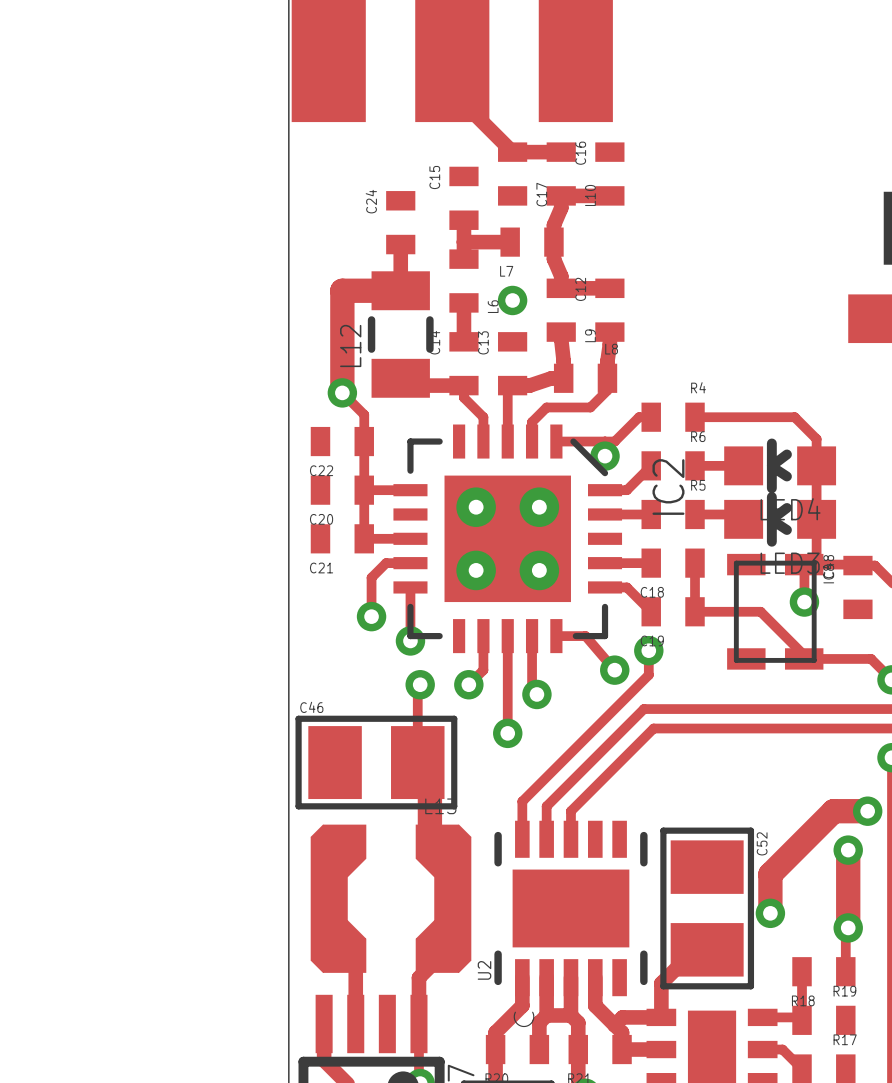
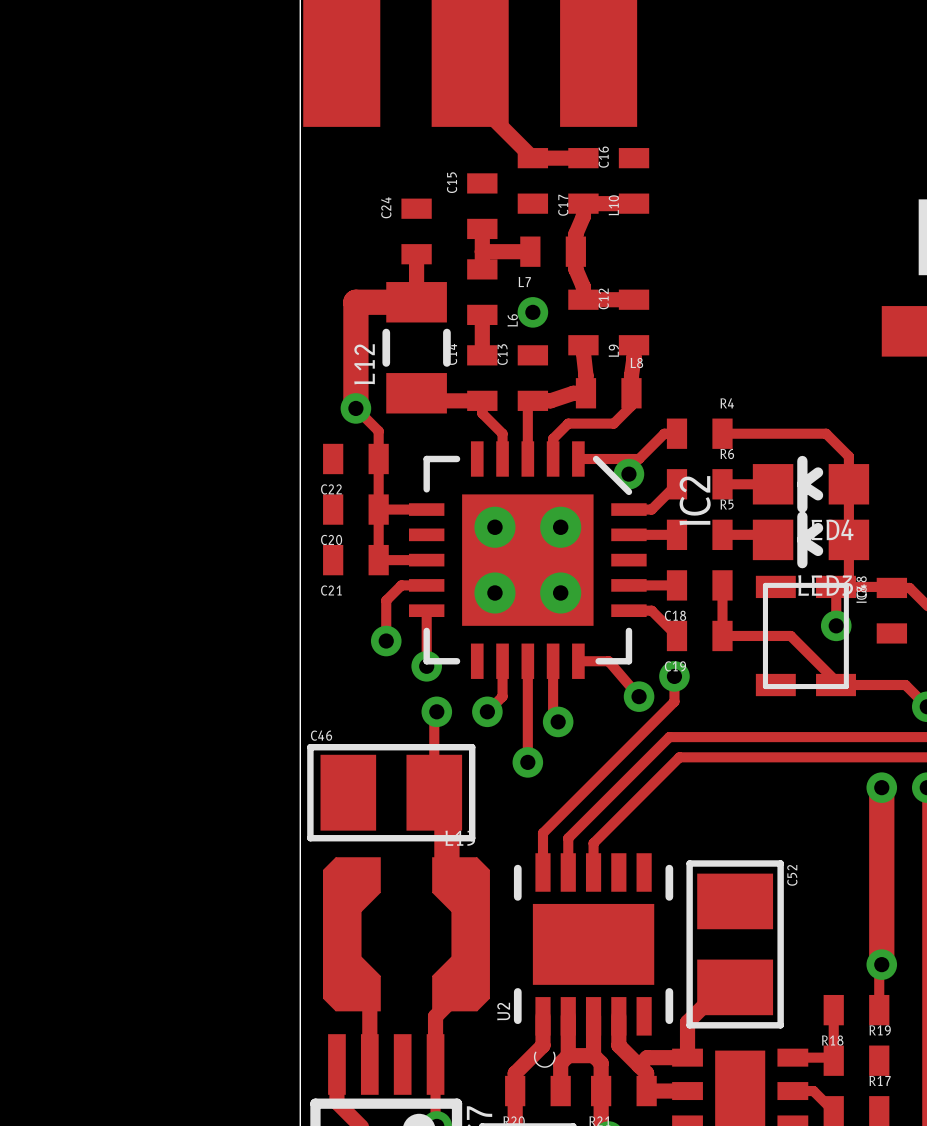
track: none -> (881, 787) (881, 883)
via: none -> (881, 787)
track: (867, 811) (833, 811) (770, 874) (770, 913) -> none
via: (867, 811) -> none
via: (848, 850) -> none
via: (770, 913) -> none

